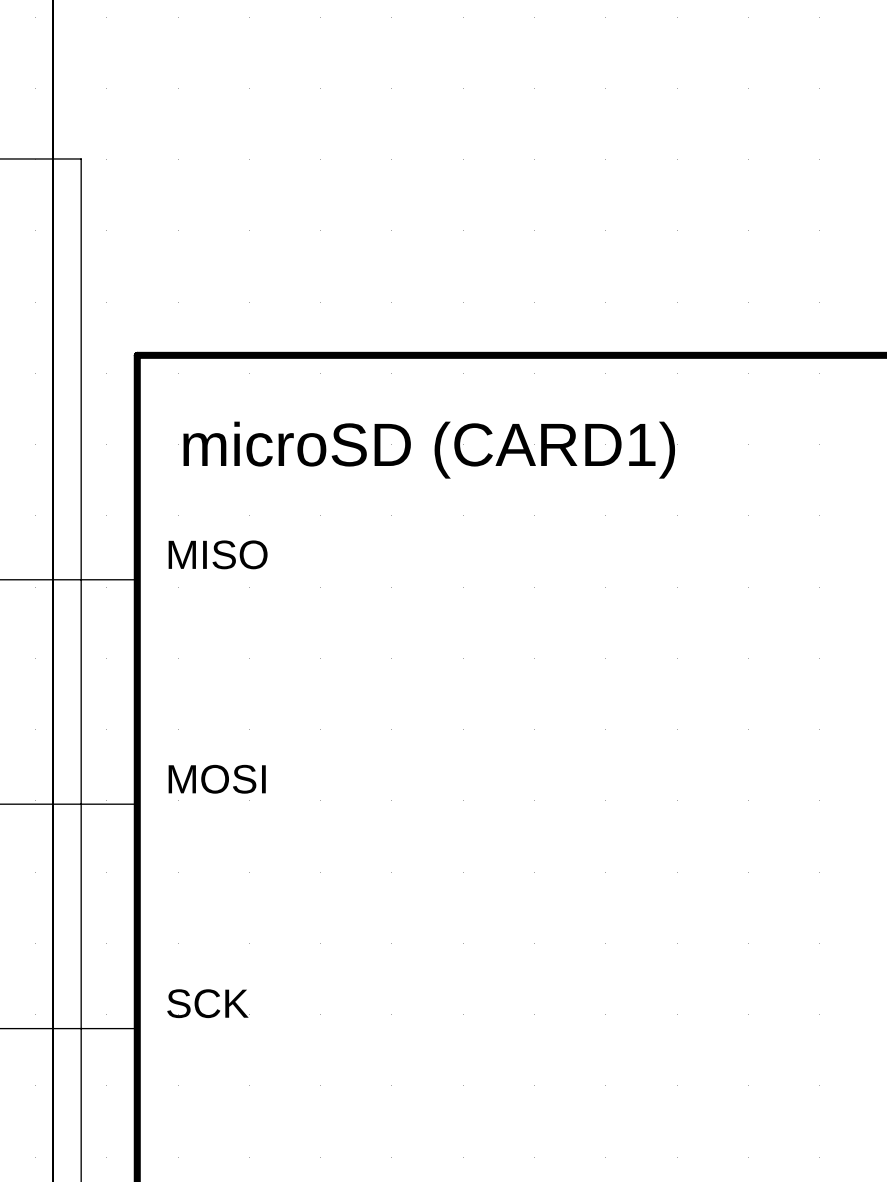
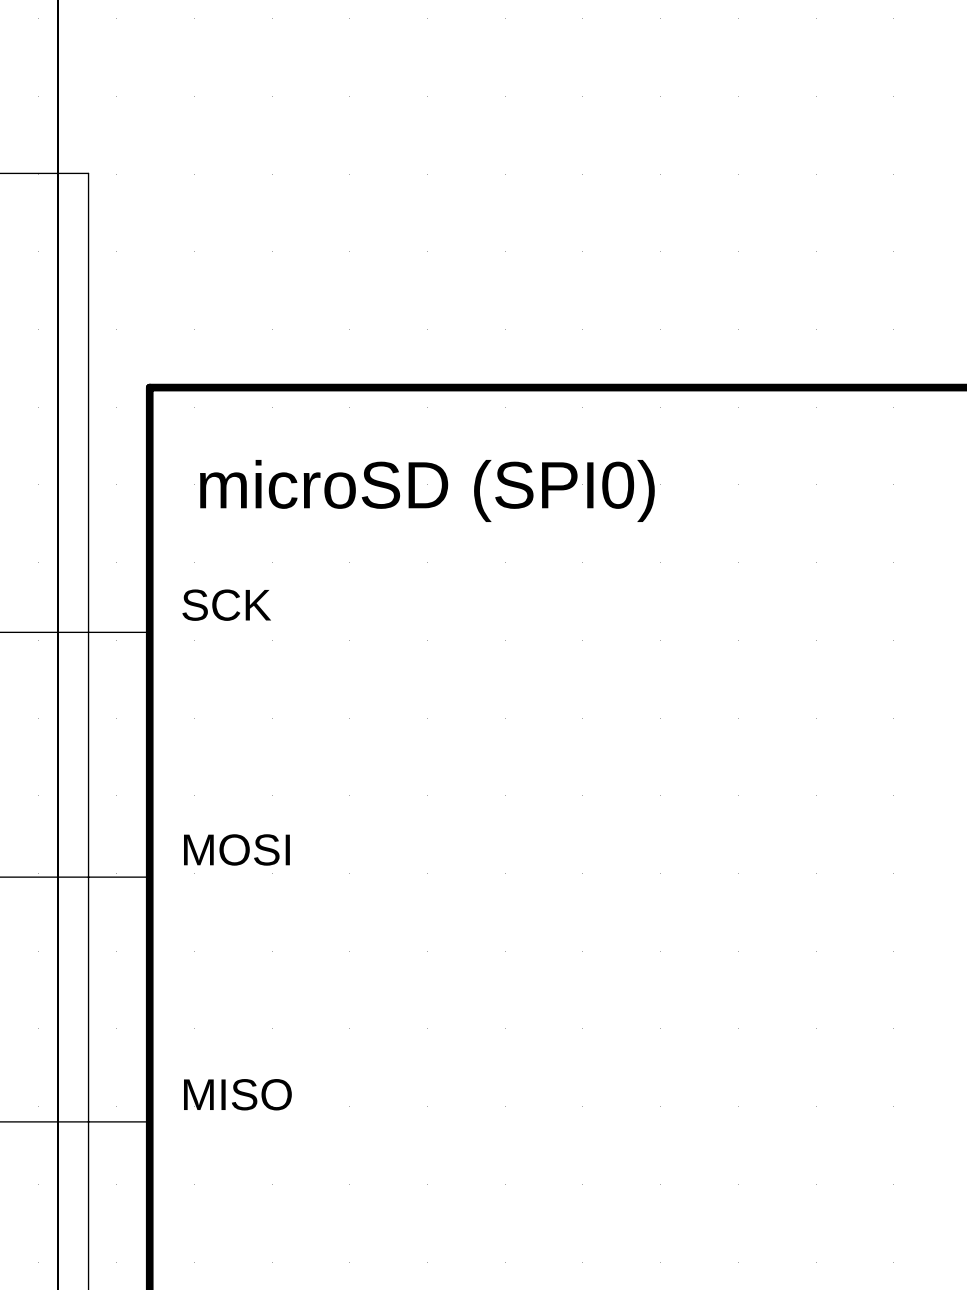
text: microSD (CARD1) (429, 450) -> microSD (SPI0) (427, 490)
text: MISO (218, 554) -> SCK (226, 605)
text: SCK (207, 1003) -> MISO (237, 1094)

